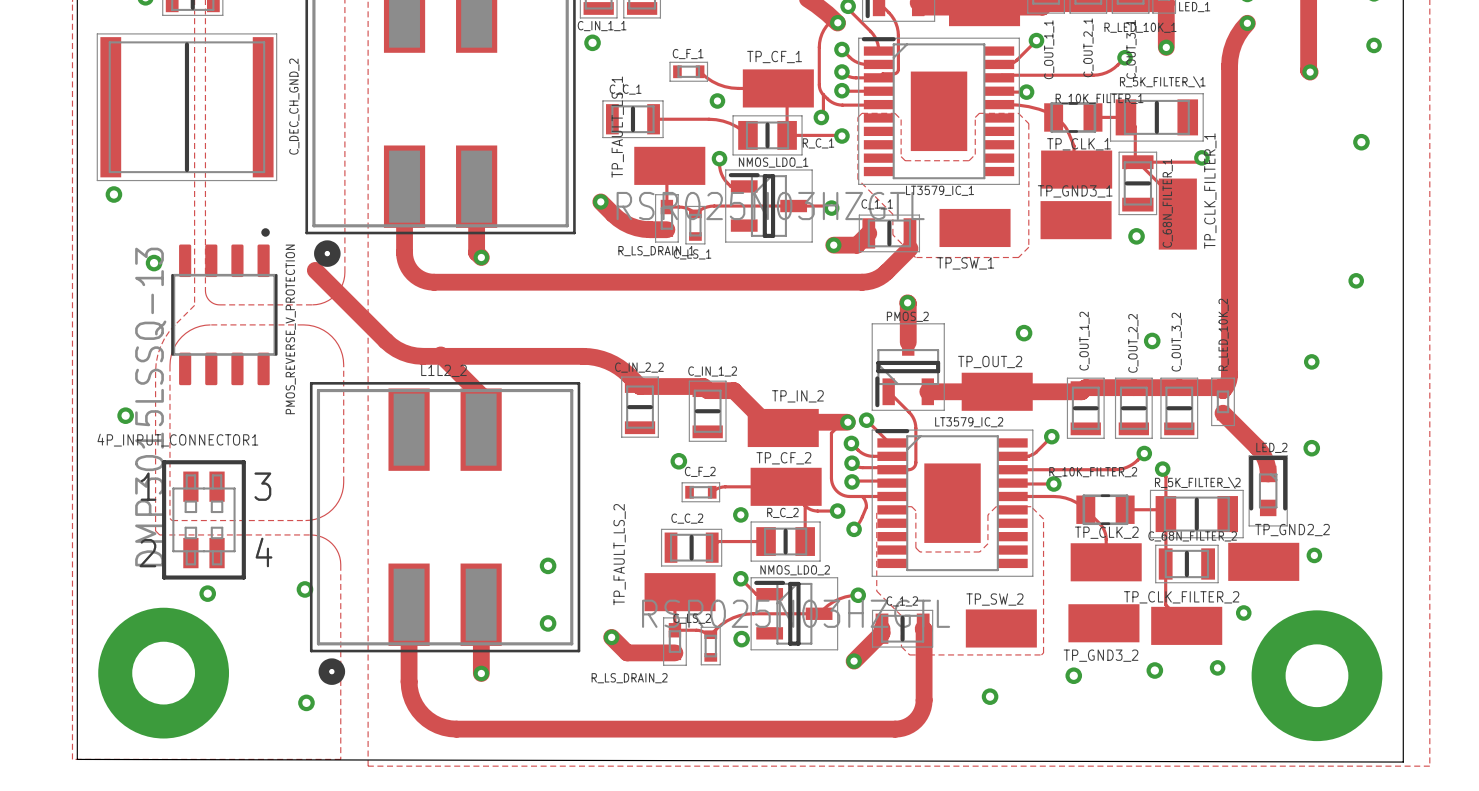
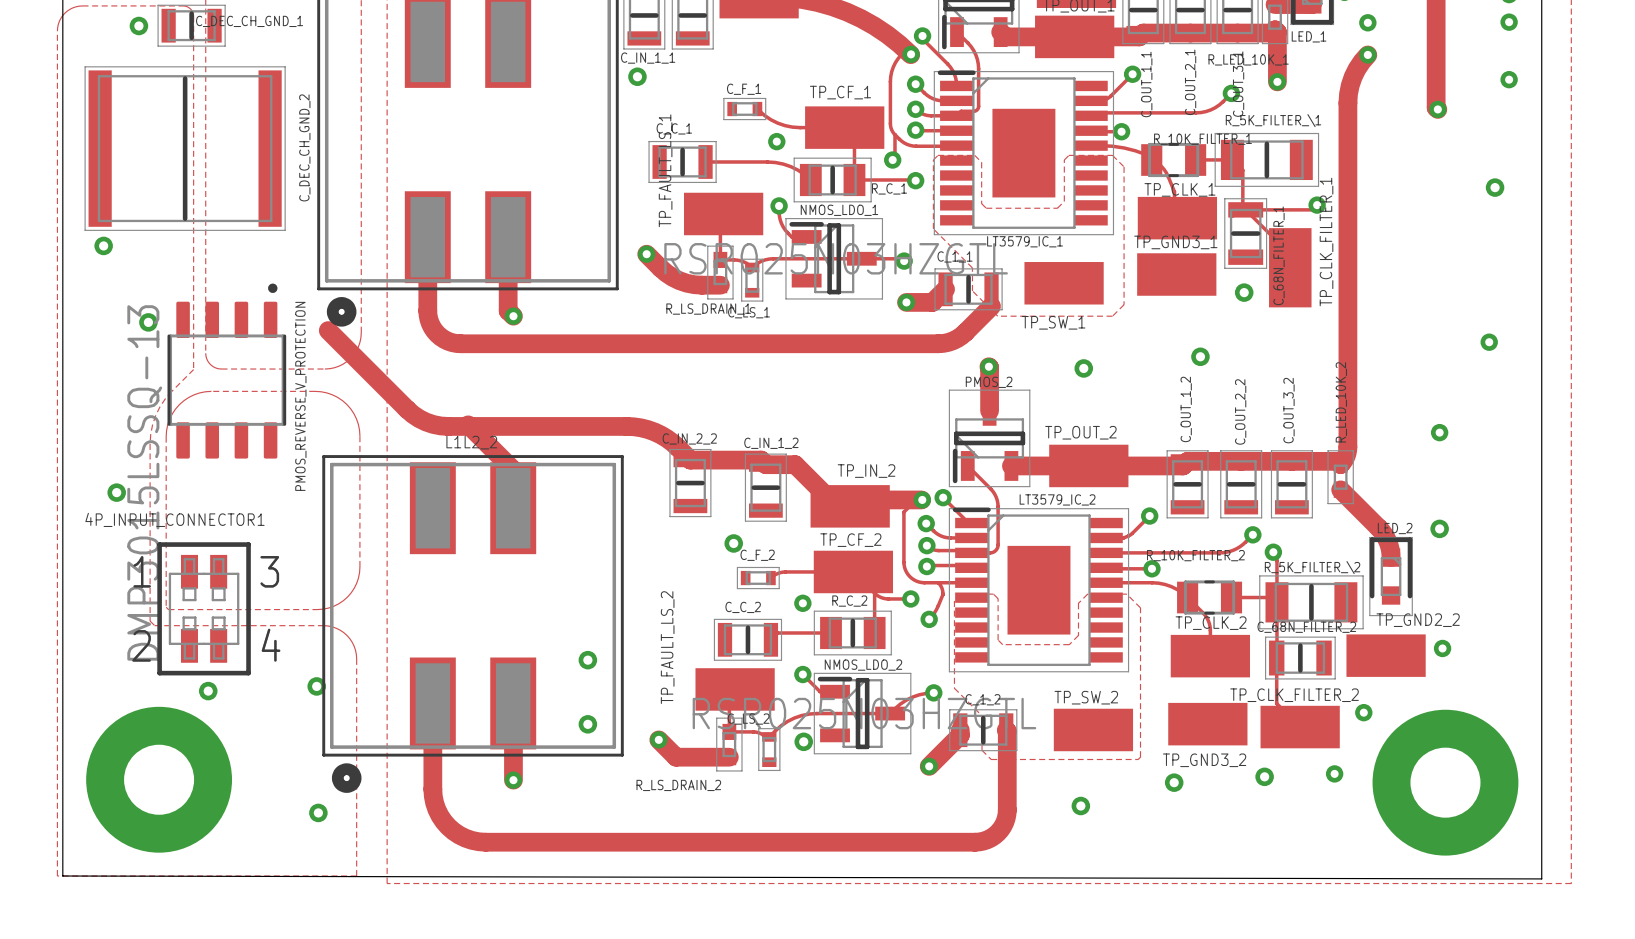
via: none -> (1200, 356)
via: none -> (1083, 368)
via: (1024, 333) -> none
via: (1152, 340) -> none

